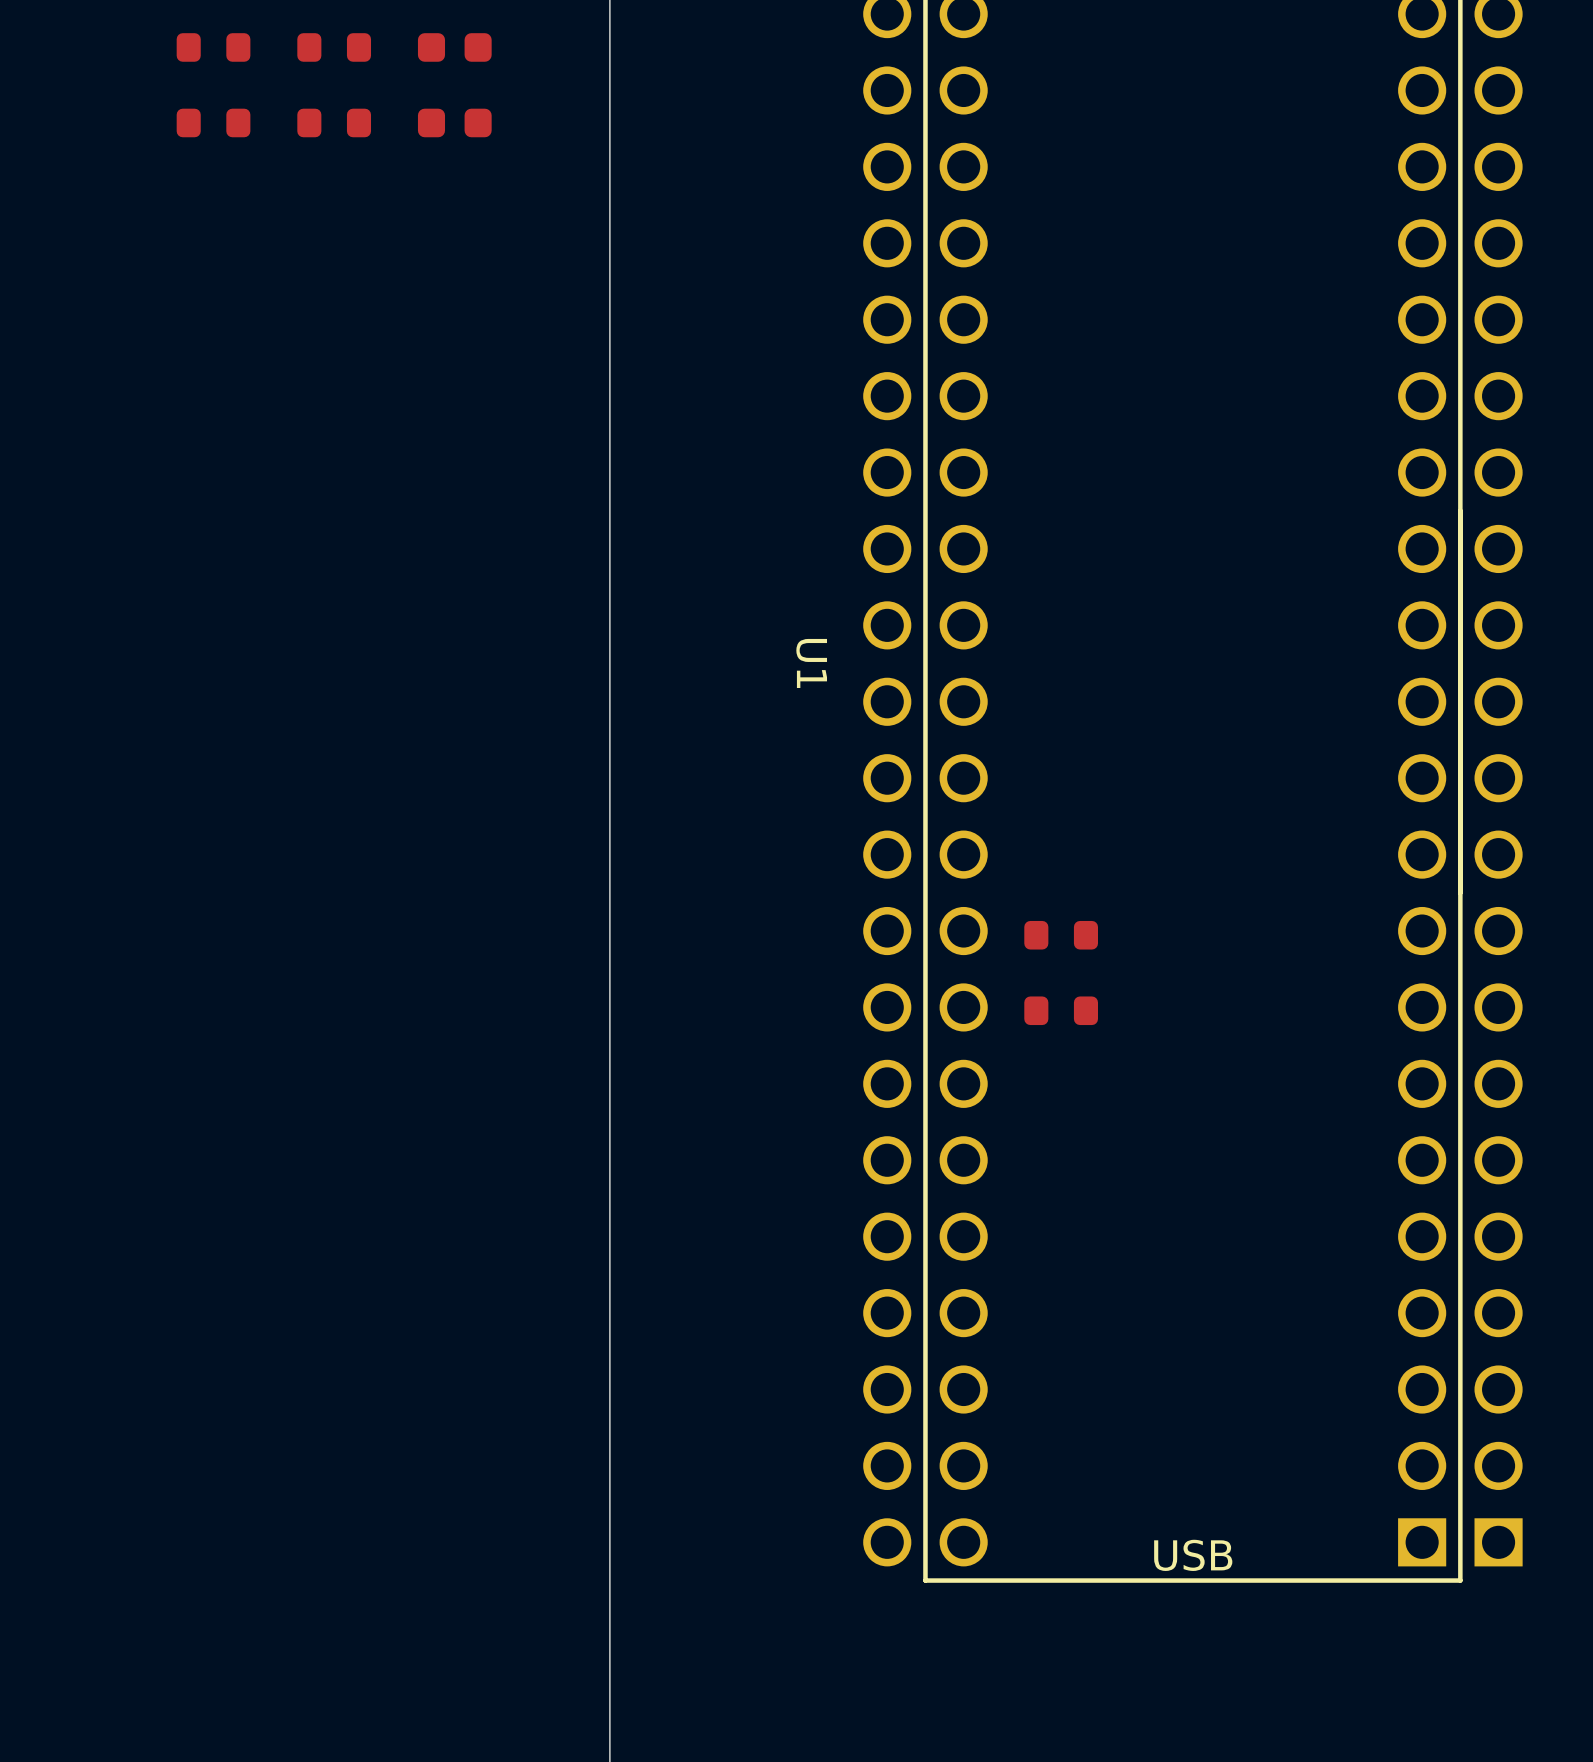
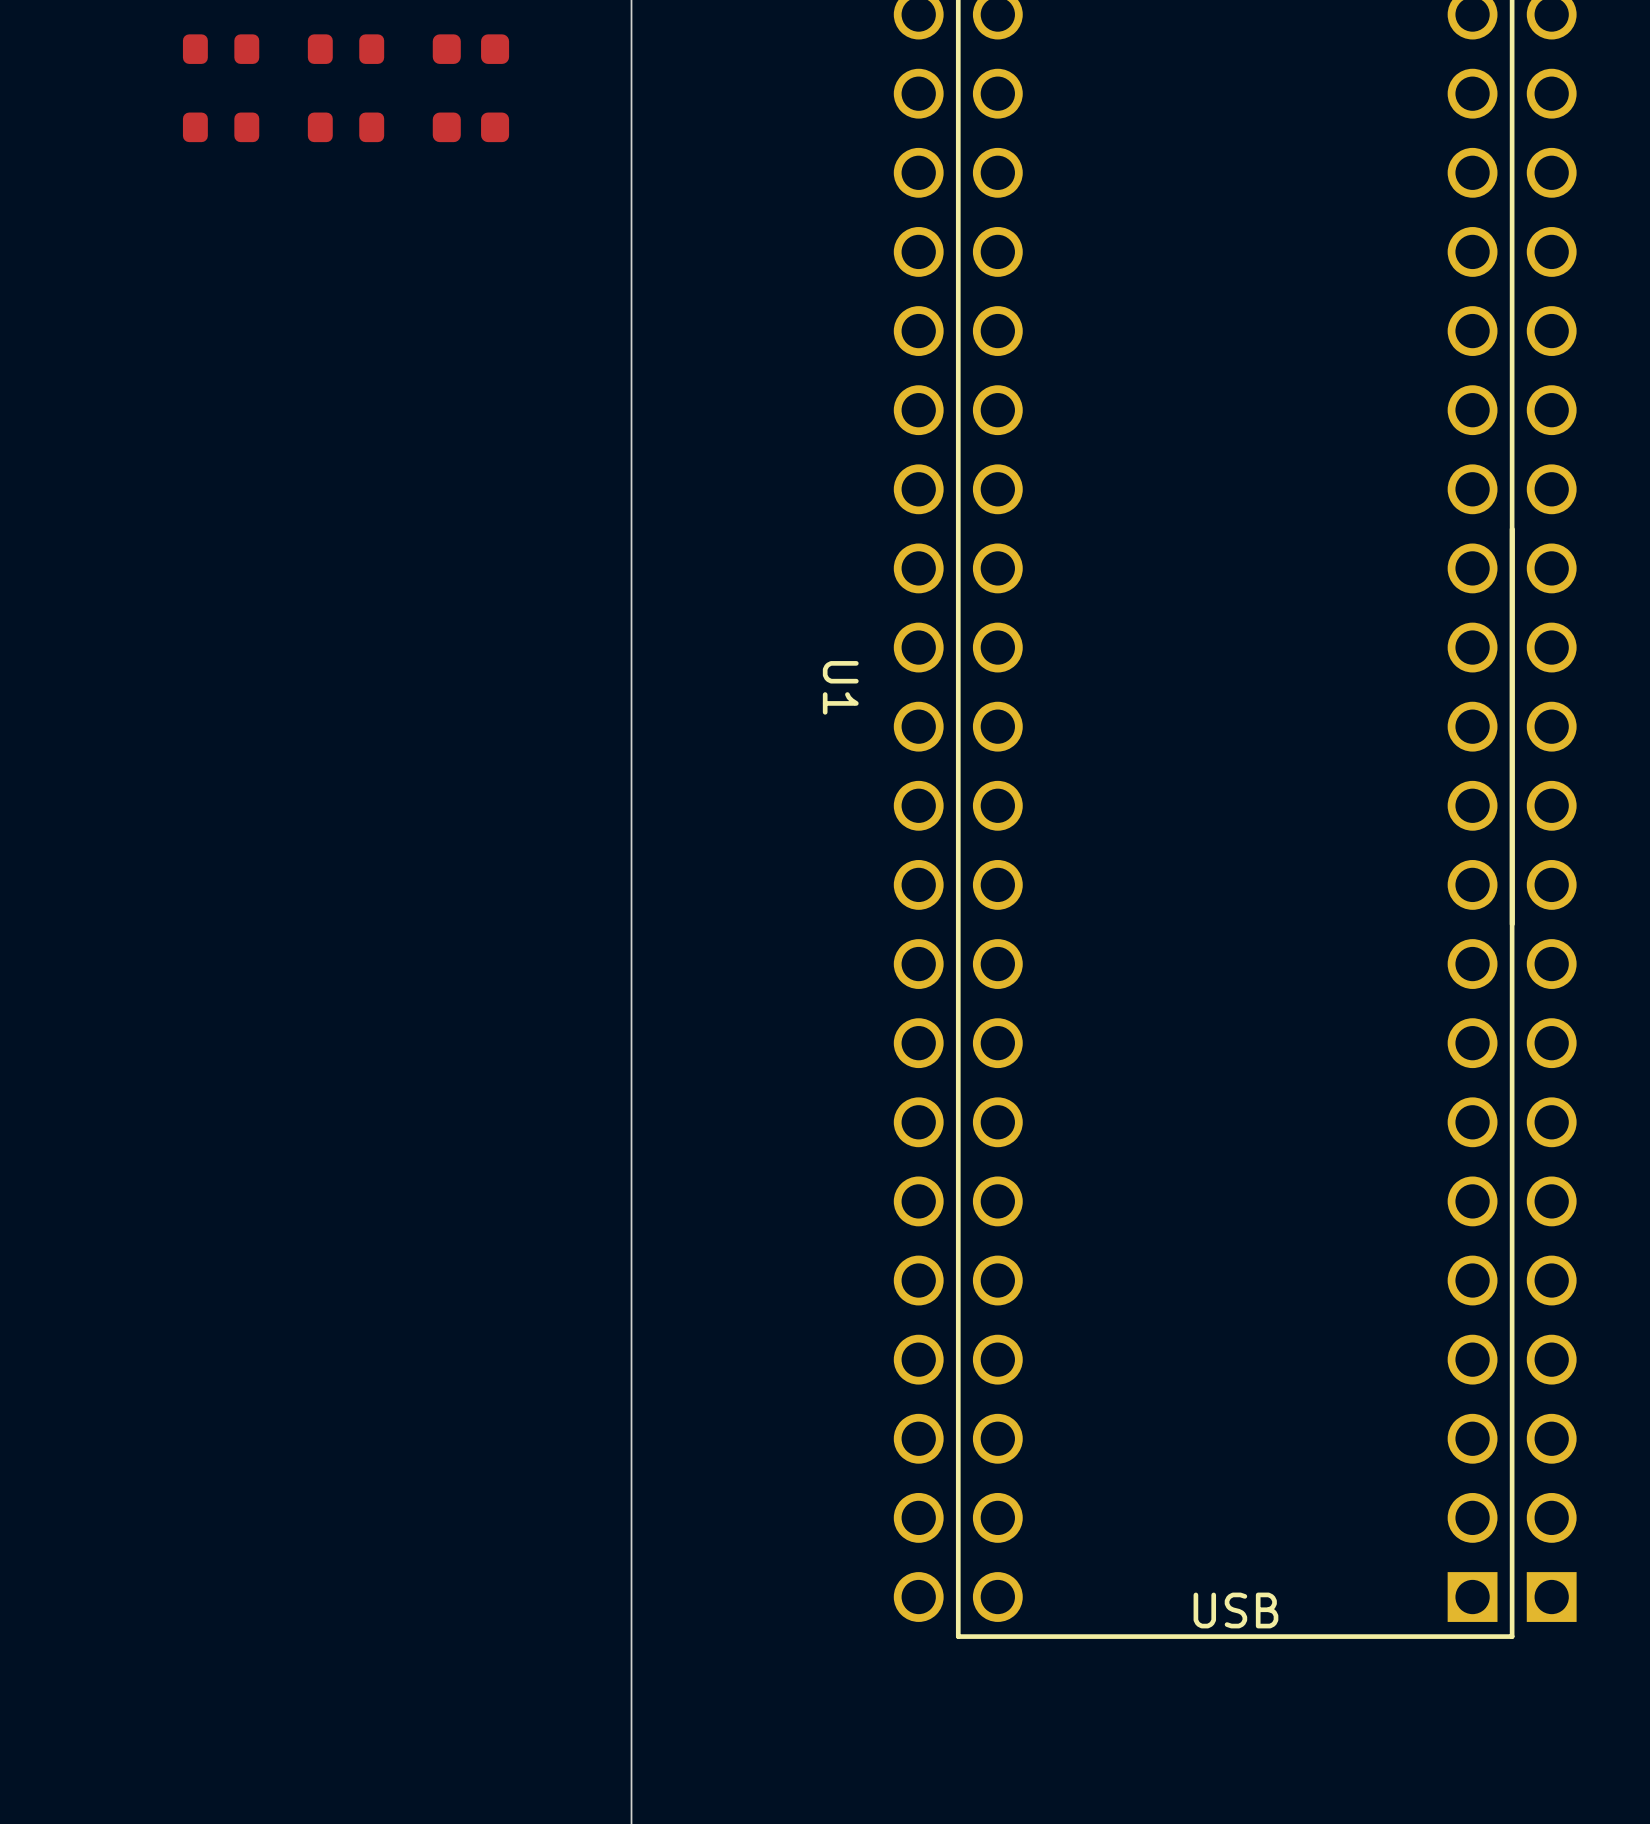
part: (1061, 935) -> none
part: (1061, 1010) -> none

